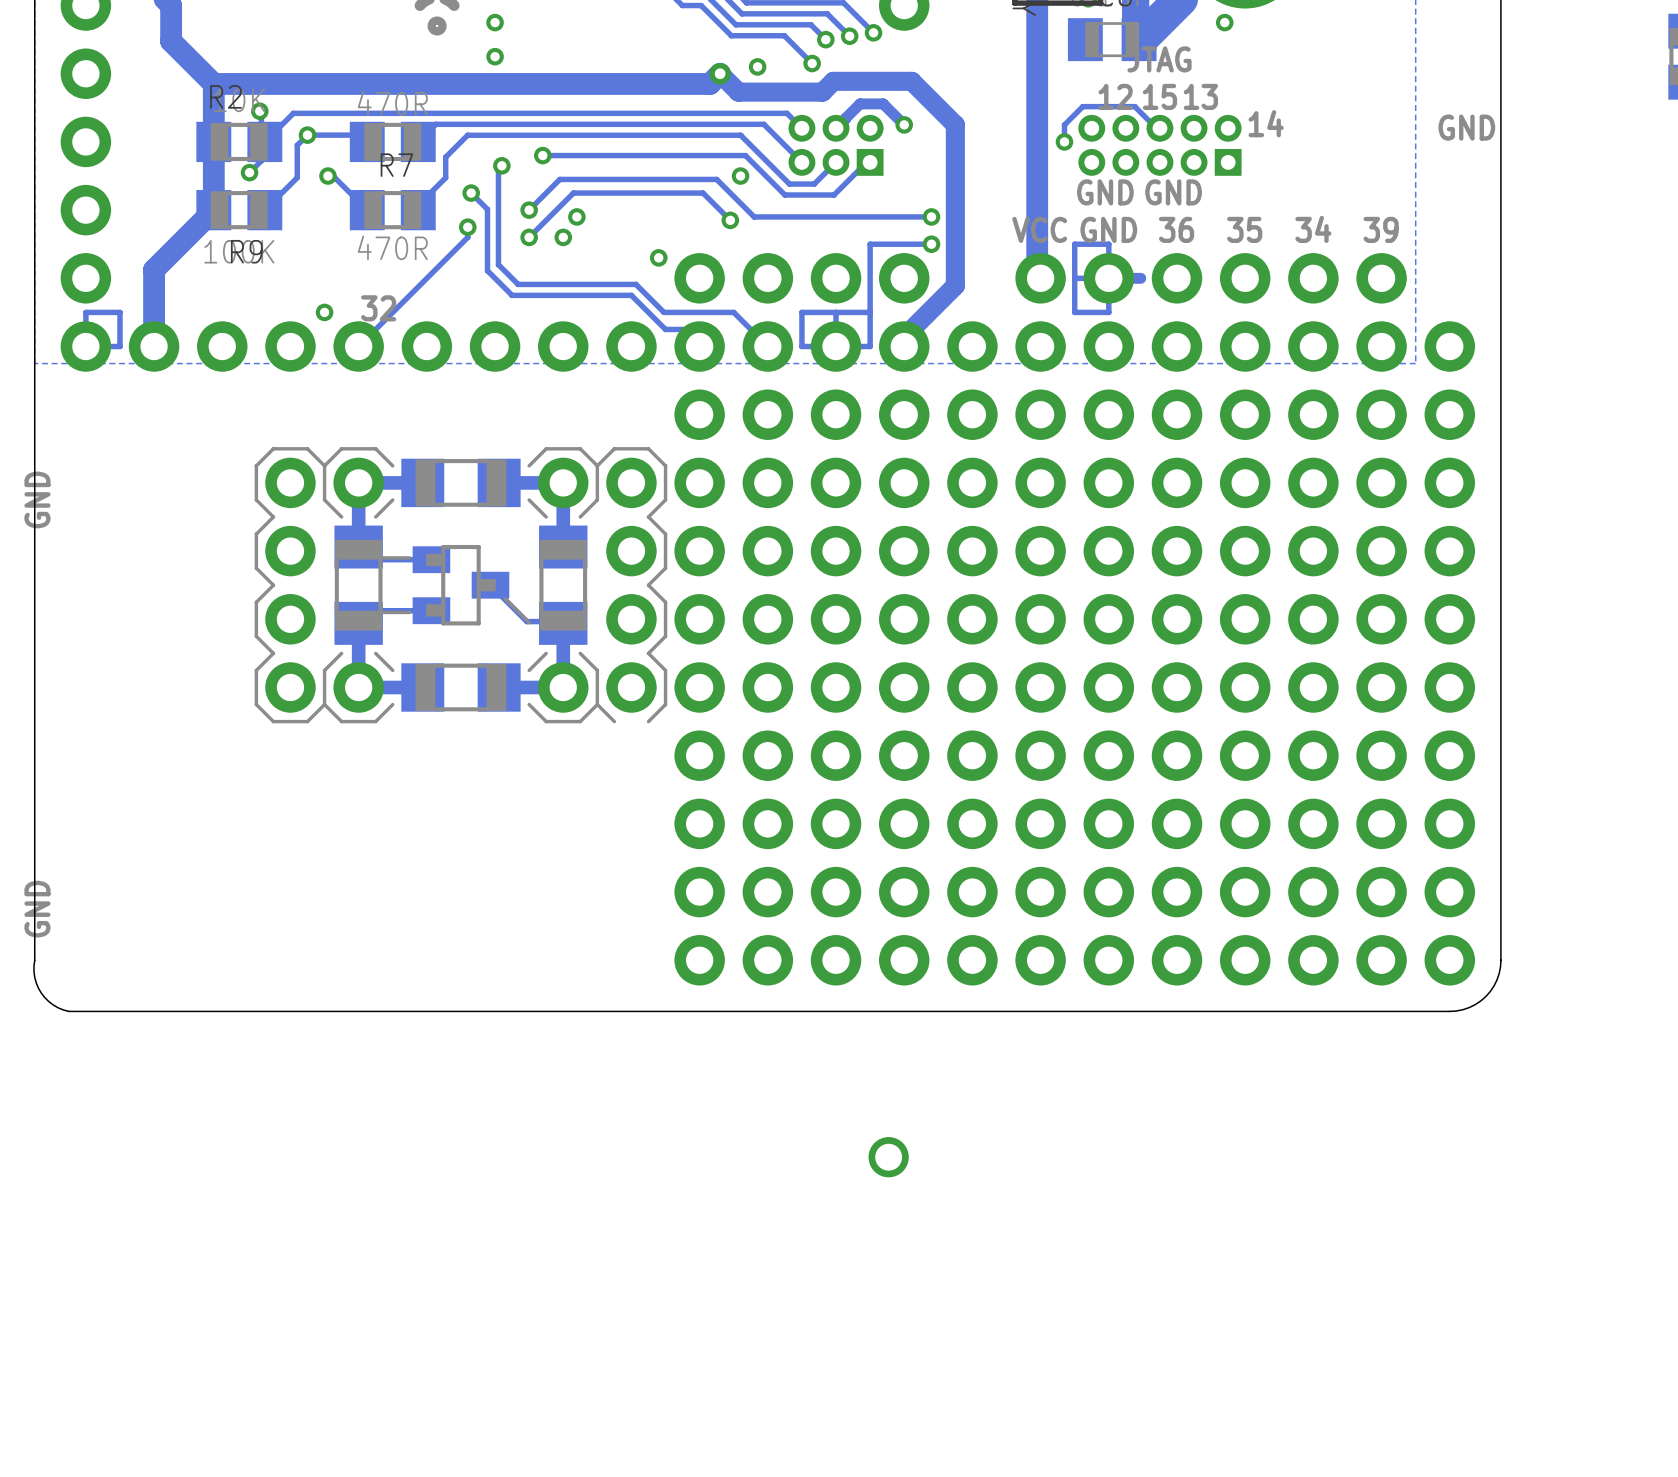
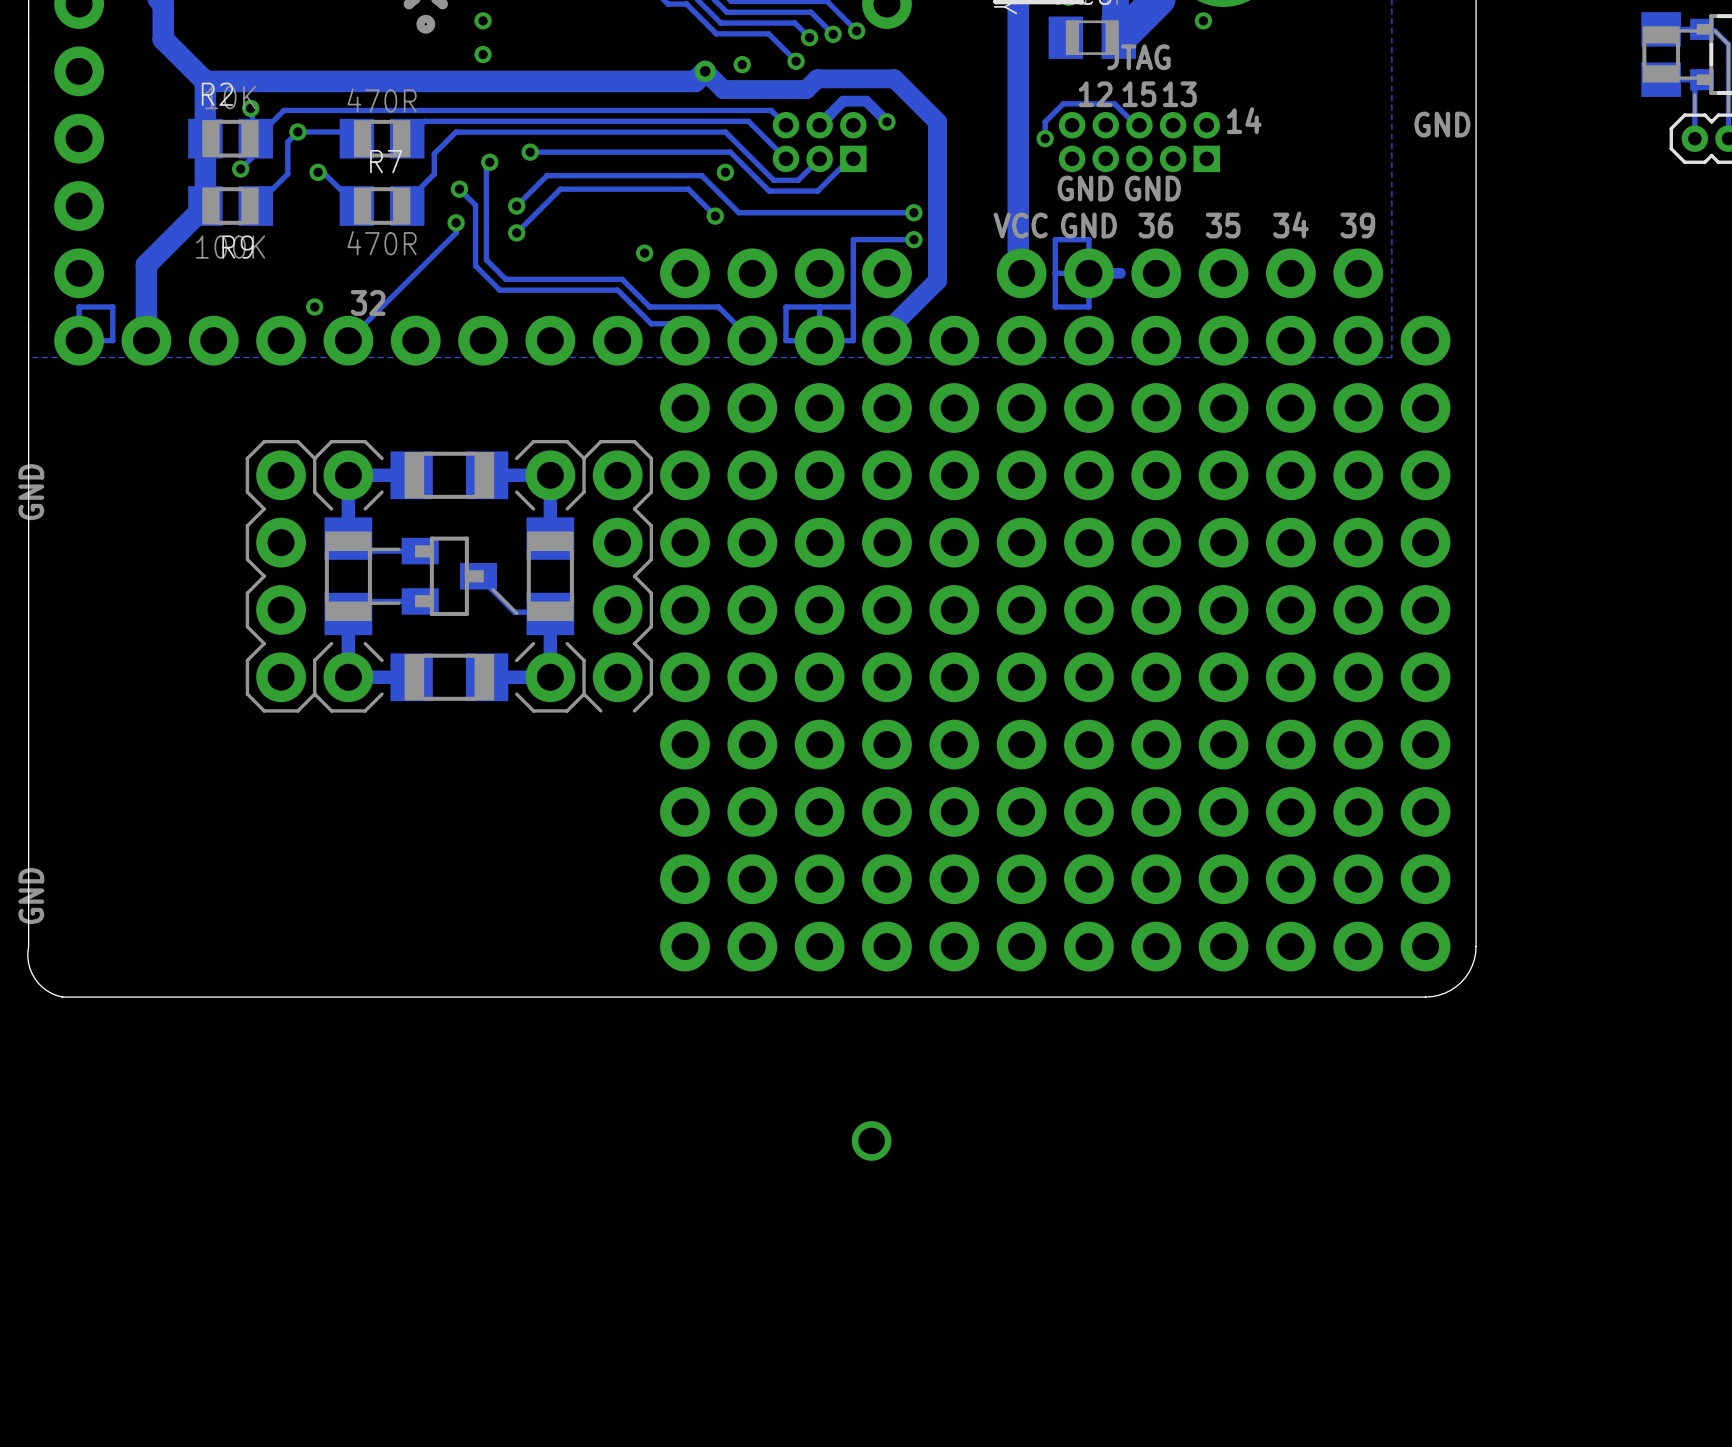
via: (576, 216) -> none
via: (563, 237) -> none

